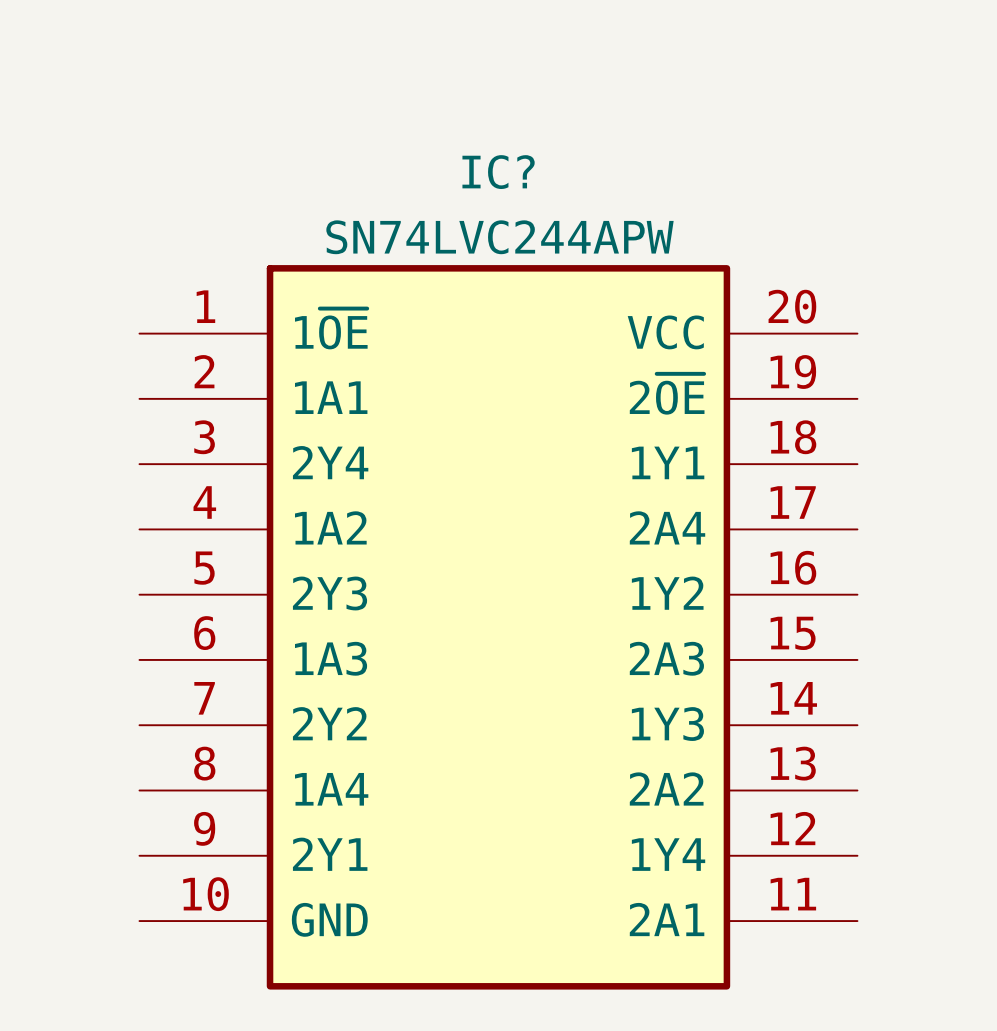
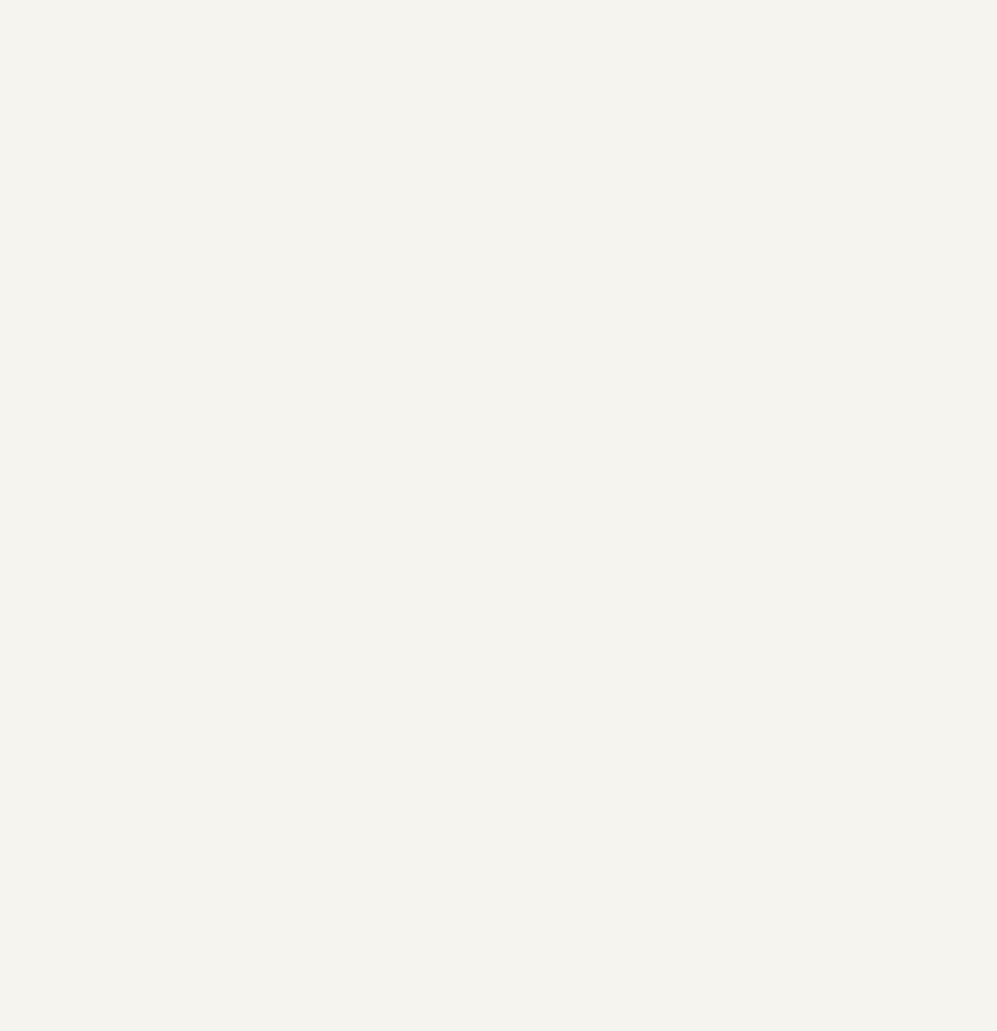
IC?: SN74LVC244APW (498, 627) -> none

